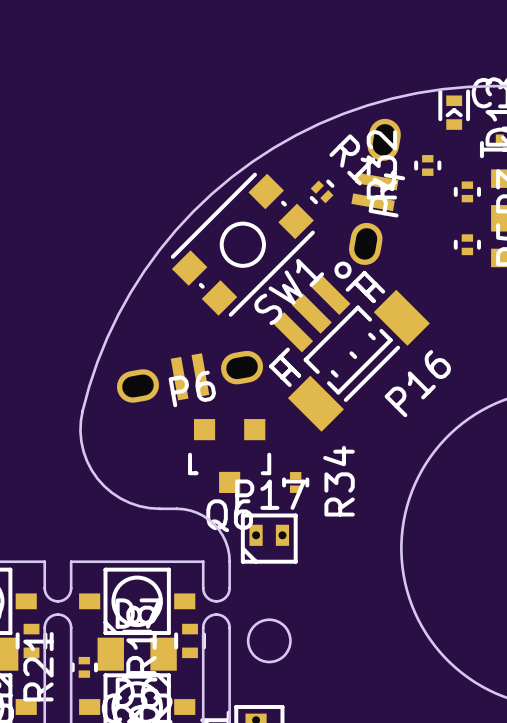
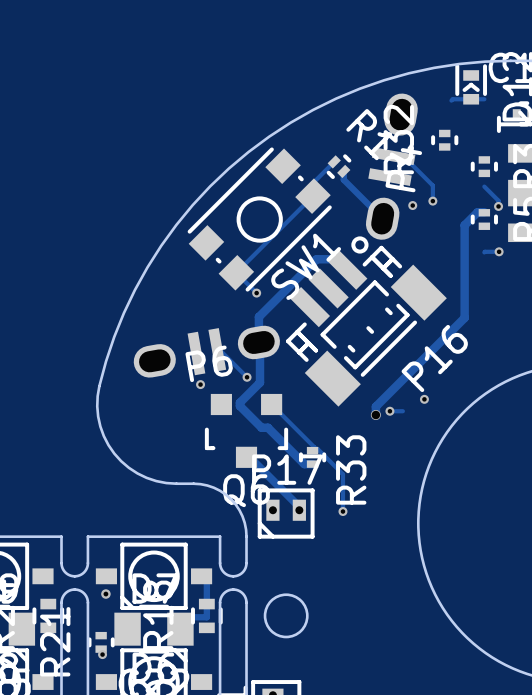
track: none -> (484, 99) (451, 100)
track: none -> (393, 156) (403, 156) (432, 185) (432, 201)
track: none -> (334, 161) (312, 183) (312, 196) (236, 272) (256, 293)
track: none -> (343, 171) (343, 179) (382, 218)
track: none -> (484, 186) (498, 200) (498, 206)
via: none -> (432, 201)
via: none -> (412, 205)
via: none -> (498, 206)
track: none -> (484, 212) (477, 212) (464, 225) (464, 317) (375, 406) (375, 415)
track: none -> (499, 251) (484, 252)
via: none -> (499, 251)
track: none -> (347, 269) (336, 259) (316, 259) (258, 316) (260, 382) (239, 402) (239, 406) (261, 427) (267, 427) (304, 464) (312, 464)
via: none -> (256, 293)
track: none -> (217, 349) (219, 349) (247, 377)
via: none -> (247, 377)
via: none -> (200, 384)
via: none -> (424, 399)
track: none -> (271, 404) (314, 448)
track: none -> (389, 411) (402, 411)
via: none -> (389, 411)
via: none -> (375, 415)
track: none -> (314, 448) (317, 448) (342, 474) (342, 511)
R34 name: R34 (338, 481) -> R33 (351, 469)
track: none -> (246, 457) (249, 457) (299, 506) (299, 510)
via: none -> (342, 511)
track: none -> (201, 576) (206, 581) (206, 617) (192, 617) (180, 629)
via: none -> (105, 594)
via: none -> (102, 654)

